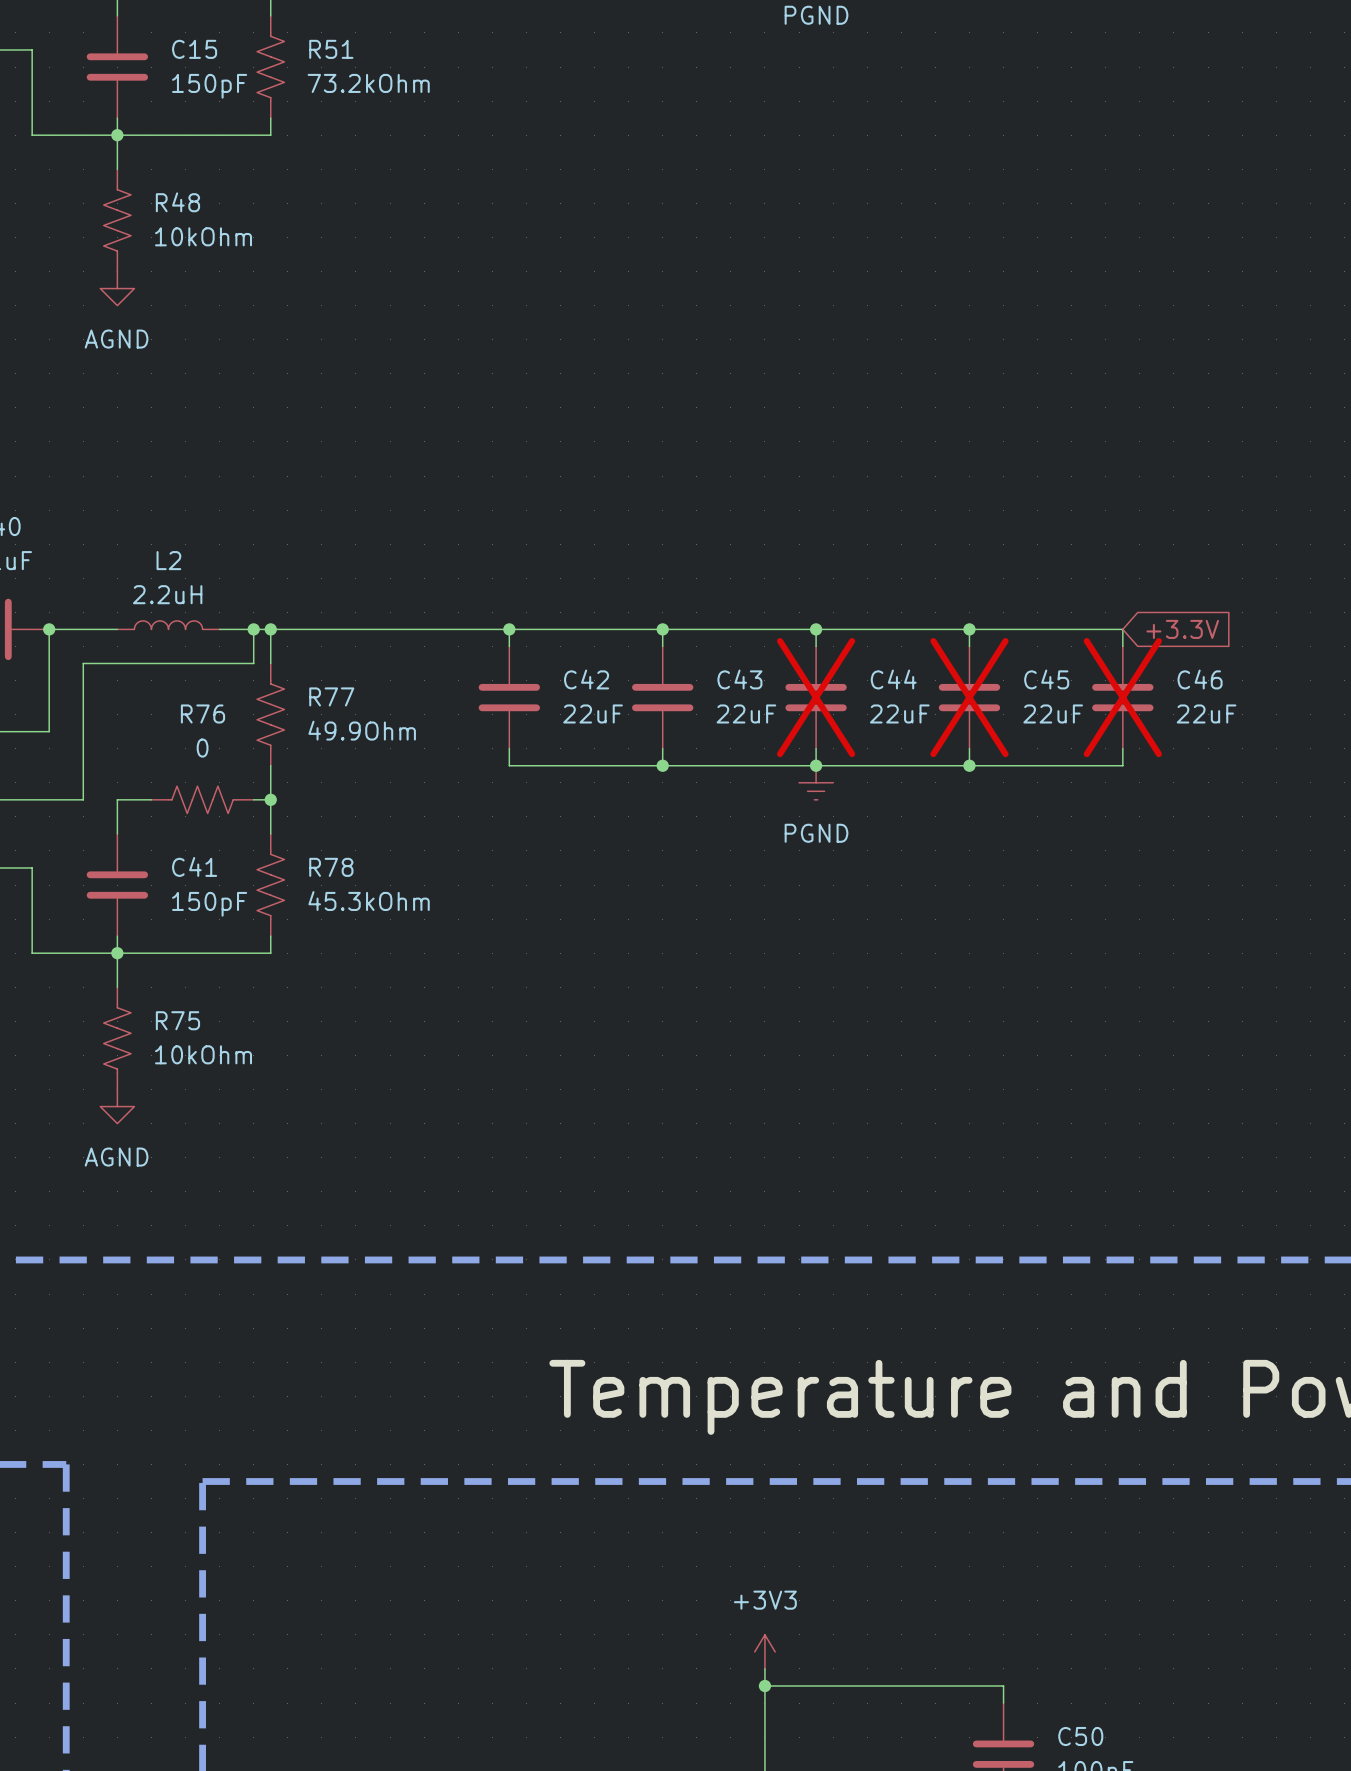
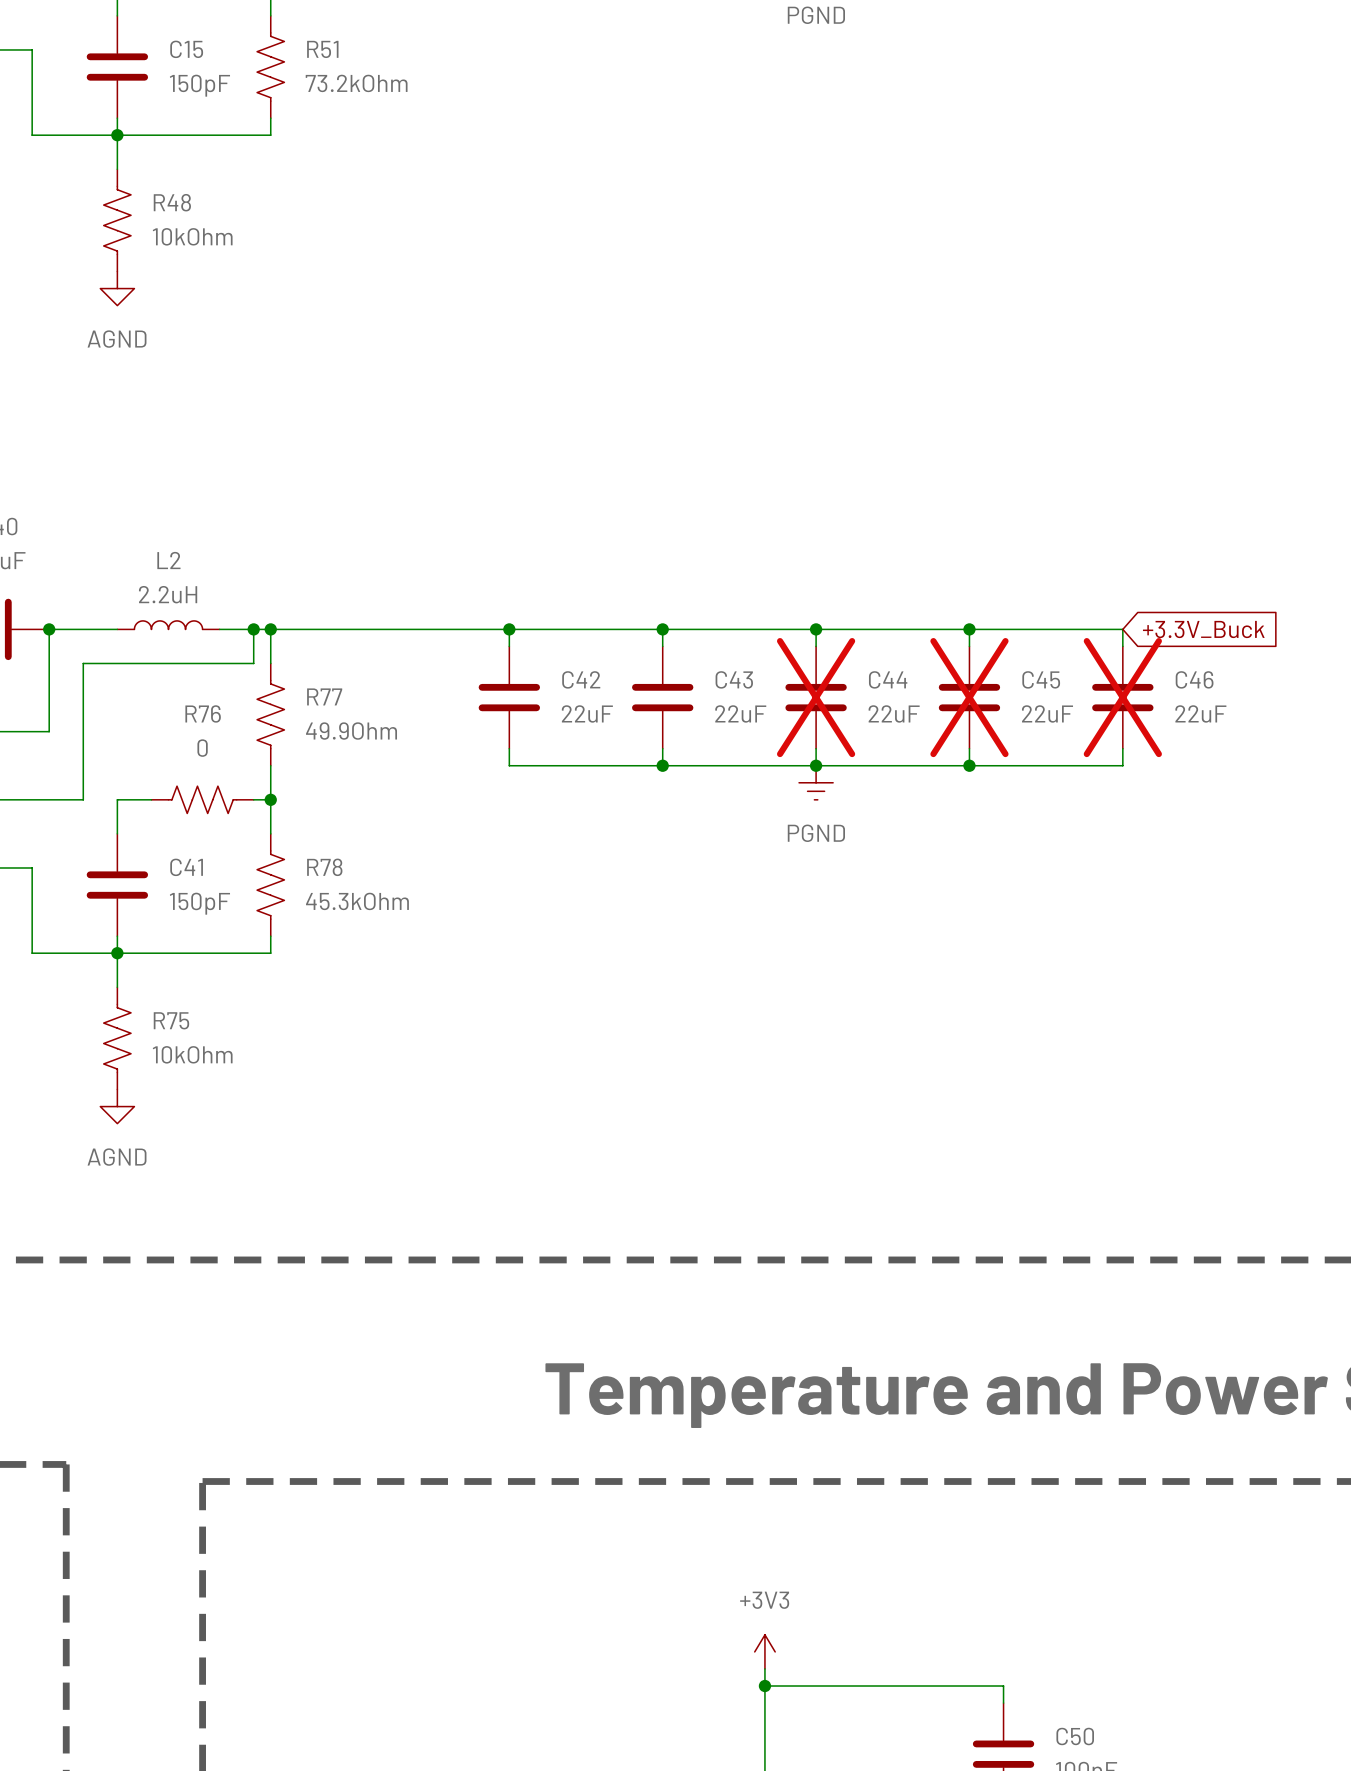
global label: +3.3V (1182, 629) -> +3.3V_Buck (1203, 629)

